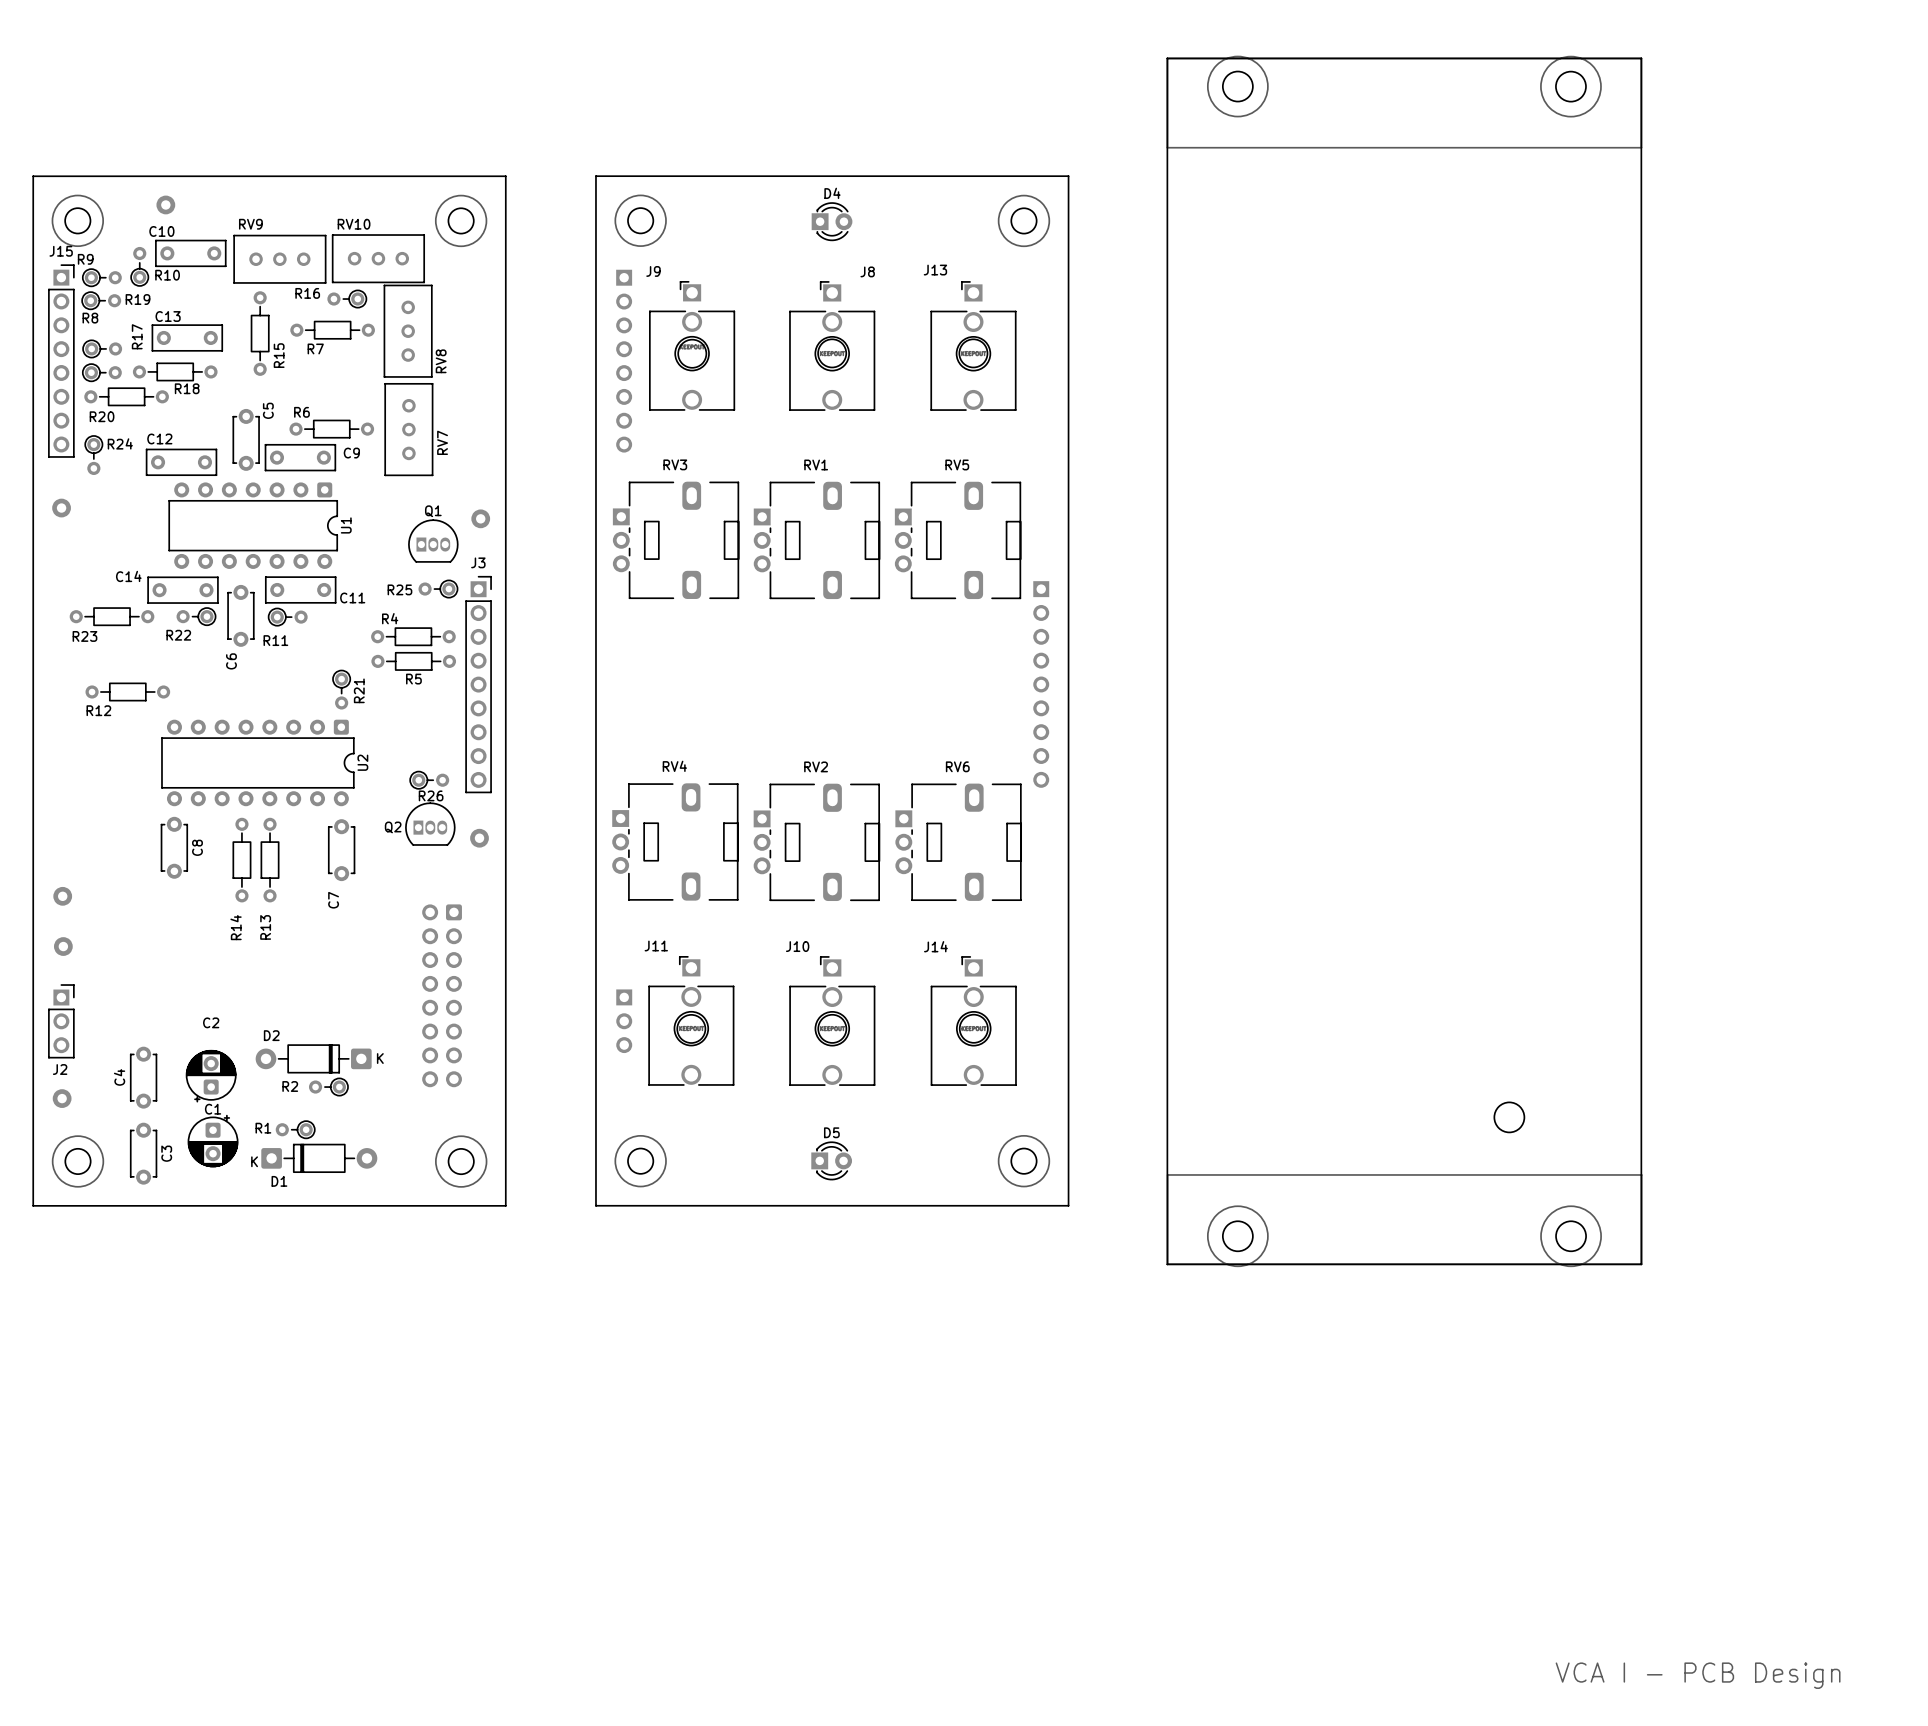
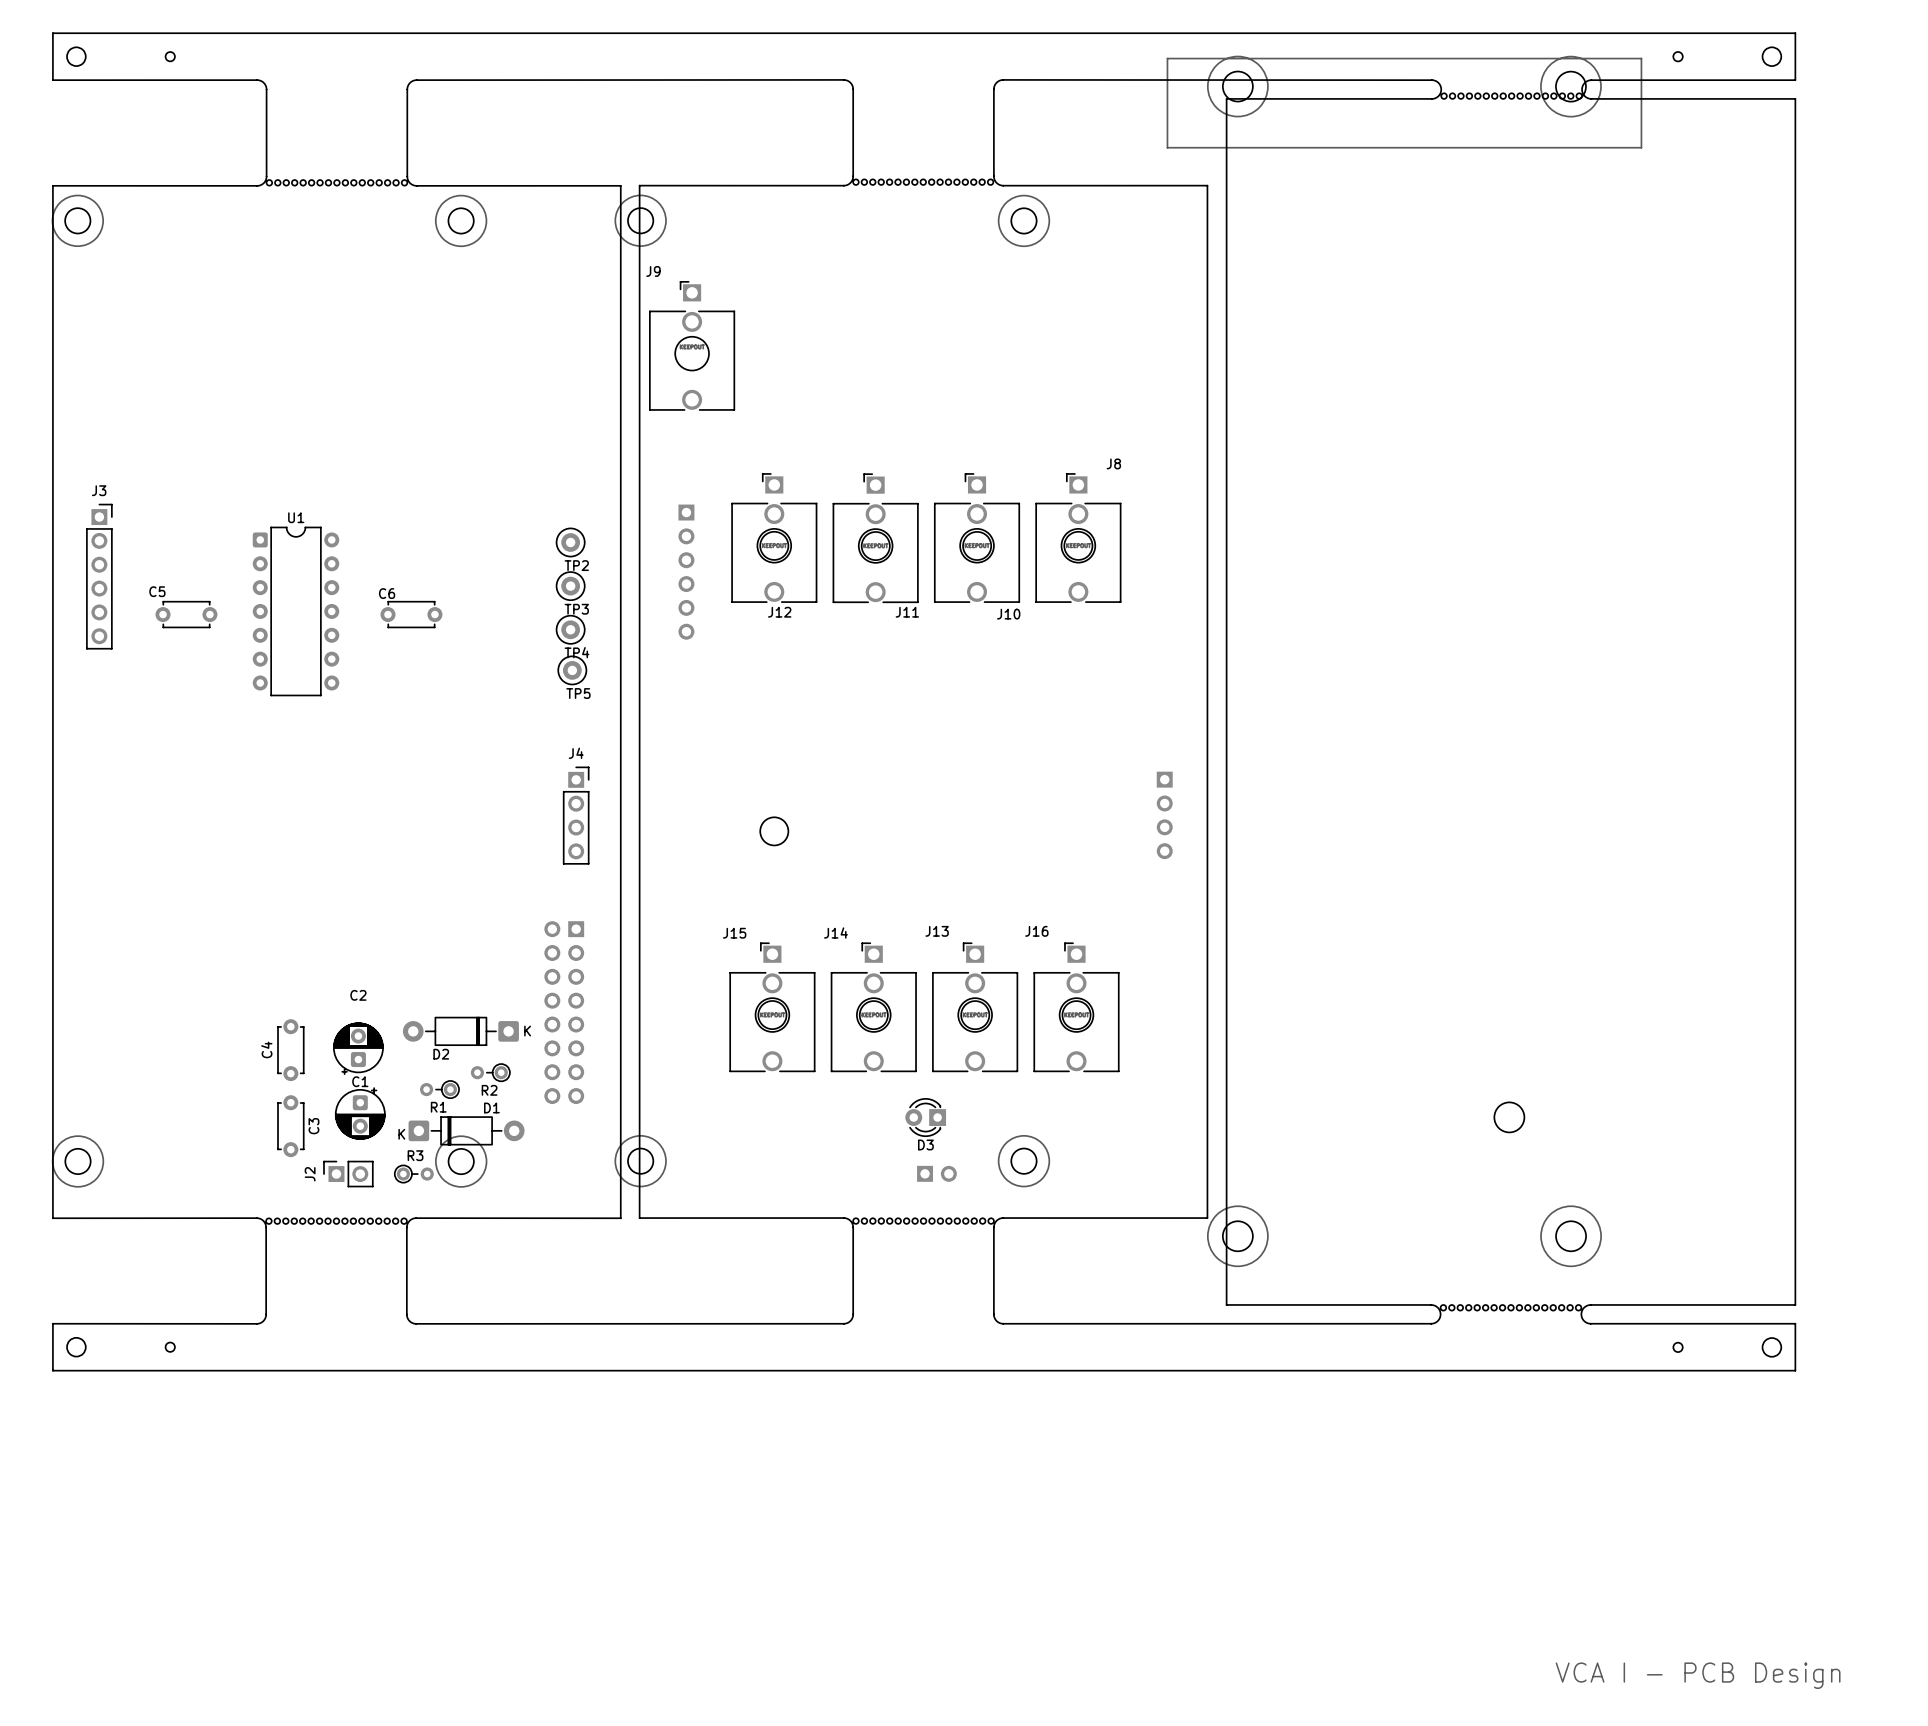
board edge: none -> (52, 33) (52, 80) (257, 80) (263, 82) (266, 89) (266, 176) (261, 184) (52, 185) (52, 1218) (260, 1219) (266, 1227) (266, 1315) (262, 1321) (256, 1323) (52, 1323) (52, 1370) (1795, 1370) (1795, 1323) (1590, 1323) (1584, 1320) (1581, 1314) (1584, 1307) (1590, 1304) (1795, 1304) (1795, 98) (1591, 98) (1584, 96) (1582, 89) (1584, 82) (1591, 80) (1795, 80) (1795, 33) (52, 33)
round board edge: none -> [1762, 46, 1782, 67]
round board edge: none -> [66, 47, 87, 67]
round board edge: none -> [165, 51, 176, 62]
round board edge: none -> [1673, 51, 1684, 62]
board edge: (1167, 58) (1641, 58) (1641, 1264) (1167, 1264) (1167, 58) -> none
board edge: none -> (843, 79) (416, 80) (411, 81) (407, 86) (407, 176) (412, 184) (620, 185) (620, 1218) (412, 1219) (406, 1227) (406, 1314) (408, 1320) (413, 1323) (843, 1323) (848, 1322) (852, 1317) (853, 1227) (847, 1218) (639, 1218) (639, 185) (847, 184) (853, 176) (853, 89) (850, 82) (843, 79)
board edge: none -> (1003, 79) (1431, 80) (1436, 81) (1440, 85) (1439, 94) (1431, 98) (1226, 98) (1226, 1304) (1432, 1305) (1437, 1307) (1440, 1313) (1439, 1319) (1434, 1323) (1003, 1323) (998, 1322) (994, 1317) (993, 1227) (999, 1218) (1207, 1218) (1207, 185) (999, 184) (993, 176) (993, 89) (996, 82) (1003, 79)
round board edge: none -> [1441, 93, 1448, 100]
round board edge: none -> [1449, 93, 1456, 100]
round board edge: none -> [1457, 93, 1465, 100]
round board edge: none -> [1466, 93, 1473, 100]
round board edge: none -> [1474, 93, 1481, 100]
round board edge: none -> [1483, 93, 1490, 100]
round board edge: none -> [1491, 93, 1498, 100]
round board edge: none -> [1500, 93, 1507, 100]
round board edge: none -> [1508, 93, 1515, 100]
round board edge: none -> [1517, 93, 1524, 100]
round board edge: none -> [1525, 93, 1532, 100]
round board edge: none -> [1533, 93, 1541, 100]
round board edge: none -> [1542, 93, 1549, 100]
round board edge: none -> [1550, 93, 1557, 100]
round board edge: none -> [1559, 93, 1566, 100]
round board edge: none -> [1567, 93, 1574, 100]
round board edge: none -> [1576, 93, 1583, 100]
board edge: (33, 176) (505, 176) (505, 1205) (33, 1205) (33, 176) -> none
board edge: (595, 176) (1068, 176) (1068, 1205) (595, 1205) (595, 176) -> none
round board edge: none -> [266, 179, 273, 186]
round board edge: none -> [274, 179, 281, 186]
round board edge: none -> [283, 179, 290, 186]
round board edge: none -> [291, 179, 298, 186]
round board edge: none -> [300, 179, 307, 186]
round board edge: none -> [308, 179, 315, 186]
round board edge: none -> [316, 179, 324, 186]
round board edge: none -> [325, 179, 332, 186]
round board edge: none -> [333, 179, 340, 186]
round board edge: none -> [342, 179, 349, 186]
round board edge: none -> [350, 179, 357, 186]
round board edge: none -> [359, 179, 366, 186]
round board edge: none -> [367, 179, 374, 186]
round board edge: none -> [376, 179, 383, 186]
round board edge: none -> [384, 179, 391, 186]
round board edge: none -> [393, 179, 400, 186]
round board edge: none -> [401, 179, 408, 186]
round board edge: none -> [852, 179, 859, 186]
round board edge: none -> [861, 179, 868, 186]
round board edge: none -> [869, 179, 876, 186]
round board edge: none -> [878, 179, 885, 186]
round board edge: none -> [886, 179, 893, 186]
round board edge: none -> [894, 179, 902, 186]
round board edge: none -> [903, 179, 910, 186]
round board edge: none -> [911, 179, 918, 186]
round board edge: none -> [920, 179, 927, 186]
round board edge: none -> [928, 179, 935, 186]
round board edge: none -> [937, 179, 944, 186]
round board edge: none -> [945, 179, 952, 186]
round board edge: none -> [953, 179, 960, 186]
round board edge: none -> [962, 179, 969, 186]
round board edge: none -> [970, 179, 977, 186]
round board edge: none -> [979, 179, 986, 186]
round board edge: none -> [987, 179, 994, 186]
part: (165, 204) -> none
D4: (832, 221) -> none
J15 name position: J15 (61, 251) -> J15 (734, 933)
C10: (190, 253) -> none
RV10: (378, 258) -> none
RV9: (279, 259) -> none
J15 footprint: [48, 264, 75, 458] -> [729, 942, 816, 1072]
R10: (139, 266) -> none
R9: (102, 277) -> none
R16: (347, 299) -> none
R19: (101, 300) -> none
R7: (332, 330) -> none
RV8: (408, 331) -> none
R15: (260, 333) -> none
C13: (187, 337) -> none
round board edge: [677, 339, 707, 369] -> none
round board edge: [817, 339, 847, 368] -> none
round board edge: [959, 339, 988, 368] -> none
J8 position: (832, 345) -> (1078, 538)
J13 position: (973, 345) -> (975, 1007)
R8: (102, 348) -> none
part: (624, 361) -> none
R18: (175, 371) -> none
R17: (102, 372) -> none
R20: (126, 396) -> none
C5 name position: C5 (268, 410) -> C5 (157, 591)
R6: (331, 429) -> none
RV7: (408, 429) -> none
C5 rotation: 0° (246, 439) -> 90° clockwise (186, 614)
C5 position: (246, 439) -> (186, 614)
R24: (93, 455) -> none
C9: (300, 457) -> none
C12: (181, 462) -> none
part: (61, 508) -> none
part: (480, 518) -> none
U1 rotation: 0° (253, 525) -> 90° counterclockwise (296, 611)
round board edge: none -> [759, 531, 789, 561]
round board edge: none -> [861, 531, 891, 561]
round board edge: none -> [962, 531, 992, 561]
round board edge: none -> [1064, 531, 1093, 561]
J12: none -> (774, 538)
RV3: (676, 540) -> none
RV1: (816, 540) -> none
RV5: (958, 540) -> none
Q1: (433, 541) -> none
TP2: none -> (570, 542)
J3 name position: J3 (478, 562) -> J3 (99, 490)
part: none -> (686, 572)
J3 footprint: [465, 576, 492, 793] -> [86, 504, 113, 650]
TP3: none -> (570, 586)
C11: (300, 589) -> none
R25: (438, 589) -> none
C14: (183, 590) -> none
C6 rotation: 0° (240, 615) -> 90° clockwise (411, 614)
C6 position: (240, 615) -> (411, 614)
R23: (112, 616) -> none
R22: (196, 616) -> none
R11: (287, 617) -> none
TP4: none -> (570, 629)
R4: (413, 636) -> none
C6 name position: C6 (231, 661) -> C6 (387, 593)
R5: (413, 661) -> none
TP5: none -> (572, 670)
part: (1041, 684) -> none
R21: (341, 689) -> none
R12: (127, 692) -> none
U2: (257, 762) -> none
R26: (429, 780) -> none
J4: none -> (576, 815)
part: none -> (1164, 815)
round board edge: none -> [759, 817, 789, 846]
Q2: (430, 824) -> none
part: (479, 838) -> none
RV4: (675, 841) -> none
RV2: (816, 842) -> none
RV6: (958, 842) -> none
C8: (174, 847) -> none
C7: (341, 850) -> none
R14: (241, 860) -> none
R13: (270, 860) -> none
part: (62, 896) -> none
J11 name position: J11 (656, 945) -> J11 (907, 612)
part: (63, 946) -> none
J10 name position: J10 (797, 946) -> J10 (1008, 614)
J2 footprint: [48, 984, 75, 1059] -> [323, 1160, 374, 1188]
part: (442, 995) -> none
round board edge: none -> [758, 1000, 787, 1030]
round board edge: none -> [859, 1000, 889, 1030]
round board edge: none -> [1062, 1000, 1091, 1030]
J16: none -> (1076, 1007)
part: none -> (564, 1012)
round board edge: [677, 1014, 706, 1044] -> none
round board edge: [818, 1014, 847, 1044] -> none
J11 position: (691, 1020) -> (875, 538)
part: (624, 1021) -> none
J10 position: (832, 1021) -> (977, 538)
J14 position: (973, 1021) -> (873, 1007)
round board edge position: (973, 1028) -> (975, 1015)
D2 name position: D2 (271, 1035) -> D2 (441, 1054)
D2 position: (313, 1058) -> (460, 1031)
J2 name position: J2 (60, 1069) -> J2 (310, 1174)
C2 position: (211, 1076) -> (358, 1048)
C4 position: (143, 1077) -> (290, 1050)
R2 name position: R2 (290, 1086) -> R2 (489, 1090)
R2 position: (328, 1087) -> (490, 1072)
part: (62, 1098) -> none
D3: none -> (925, 1117)
R1 name position: R1 (263, 1128) -> R1 (438, 1107)
R1 position: (295, 1129) -> (439, 1089)
C1 position: (213, 1141) -> (360, 1113)
C3 position: (143, 1153) -> (290, 1126)
D1 position: (319, 1158) -> (466, 1130)
D5: (831, 1160) -> none
part: none -> (936, 1173)
R3: none -> (413, 1174)
line: (1167, 1174) (1641, 1174) (1641, 1264) (1167, 1264) (1167, 1174) -> none
D1 name position: D1 (279, 1181) -> D1 (491, 1107)
round board edge: none -> [265, 1218, 272, 1225]
round board edge: none -> [274, 1218, 281, 1225]
round board edge: none -> [282, 1218, 289, 1225]
round board edge: none -> [291, 1218, 298, 1225]
round board edge: none -> [299, 1218, 306, 1225]
round board edge: none -> [308, 1218, 315, 1225]
round board edge: none -> [316, 1218, 323, 1225]
round board edge: none -> [324, 1218, 332, 1225]
round board edge: none -> [333, 1218, 340, 1225]
round board edge: none -> [341, 1218, 348, 1225]
round board edge: none -> [350, 1218, 357, 1225]
round board edge: none -> [358, 1218, 365, 1225]
round board edge: none -> [367, 1218, 374, 1225]
round board edge: none -> [375, 1218, 382, 1225]
round board edge: none -> [384, 1218, 391, 1225]
round board edge: none -> [392, 1218, 399, 1225]
round board edge: none -> [401, 1218, 408, 1225]
round board edge: none -> [852, 1218, 860, 1225]
round board edge: none -> [861, 1218, 868, 1225]
round board edge: none -> [869, 1218, 876, 1225]
round board edge: none -> [878, 1218, 885, 1225]
round board edge: none -> [886, 1218, 893, 1225]
round board edge: none -> [895, 1218, 902, 1225]
round board edge: none -> [903, 1218, 910, 1225]
round board edge: none -> [912, 1218, 919, 1225]
round board edge: none -> [920, 1218, 927, 1225]
round board edge: none -> [928, 1218, 936, 1225]
round board edge: none -> [937, 1218, 944, 1225]
round board edge: none -> [945, 1218, 952, 1225]
round board edge: none -> [954, 1218, 961, 1225]
round board edge: none -> [962, 1218, 969, 1225]
round board edge: none -> [971, 1218, 978, 1225]
round board edge: none -> [979, 1218, 986, 1225]
round board edge: none -> [988, 1218, 995, 1225]
round board edge: none -> [1440, 1304, 1447, 1311]
round board edge: none -> [1448, 1304, 1455, 1311]
round board edge: none -> [1457, 1304, 1464, 1311]
round board edge: none -> [1465, 1304, 1472, 1311]
round board edge: none -> [1474, 1304, 1481, 1311]
round board edge: none -> [1482, 1304, 1489, 1311]
round board edge: none -> [1491, 1304, 1498, 1311]
round board edge: none -> [1499, 1304, 1506, 1311]
round board edge: none -> [1507, 1304, 1515, 1311]
round board edge: none -> [1516, 1304, 1523, 1311]
round board edge: none -> [1524, 1304, 1531, 1311]
round board edge: none -> [1533, 1304, 1540, 1311]
round board edge: none -> [1541, 1304, 1548, 1311]
round board edge: none -> [1550, 1304, 1557, 1311]
round board edge: none -> [1558, 1304, 1565, 1311]
round board edge: none -> [1567, 1304, 1574, 1311]
round board edge: none -> [1575, 1304, 1582, 1311]
round board edge: none -> [66, 1337, 87, 1358]
round board edge: none -> [1762, 1337, 1782, 1358]
round board edge: none -> [165, 1342, 176, 1353]
round board edge: none -> [1673, 1342, 1683, 1353]

